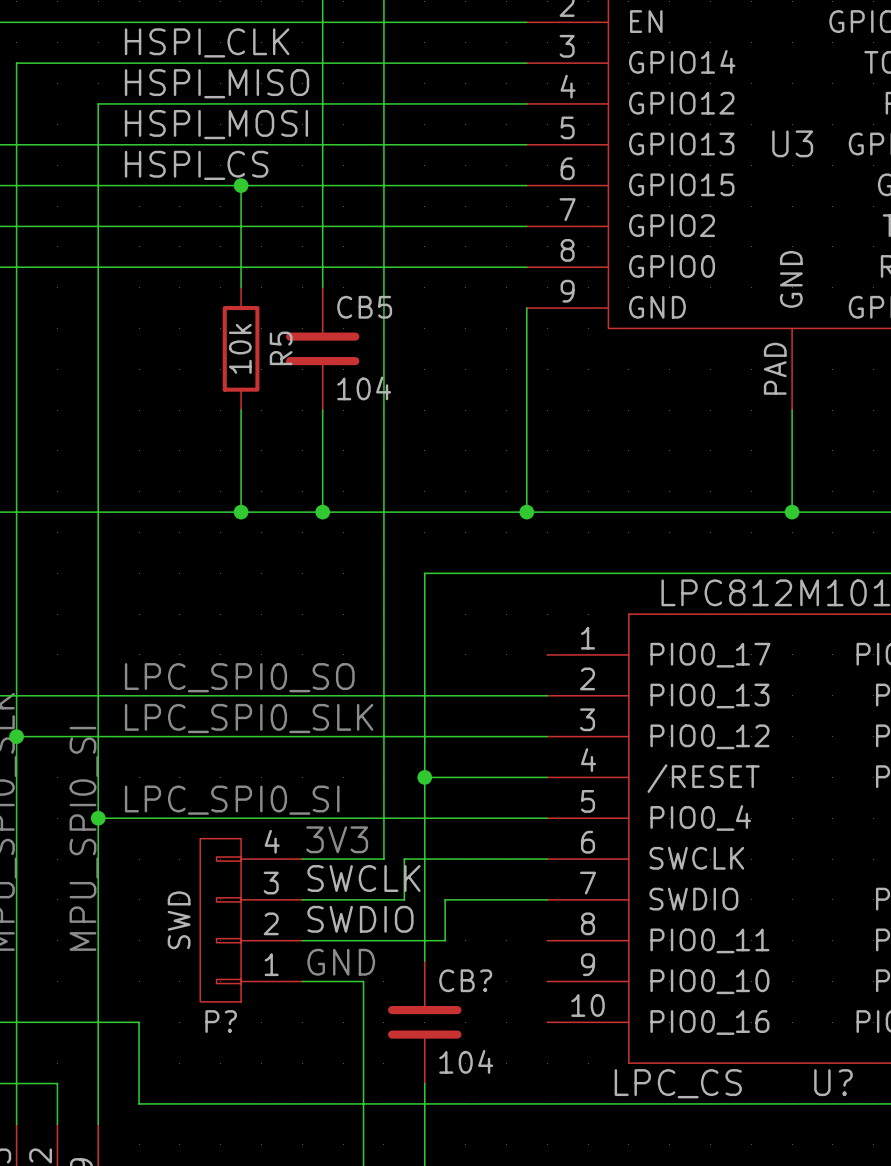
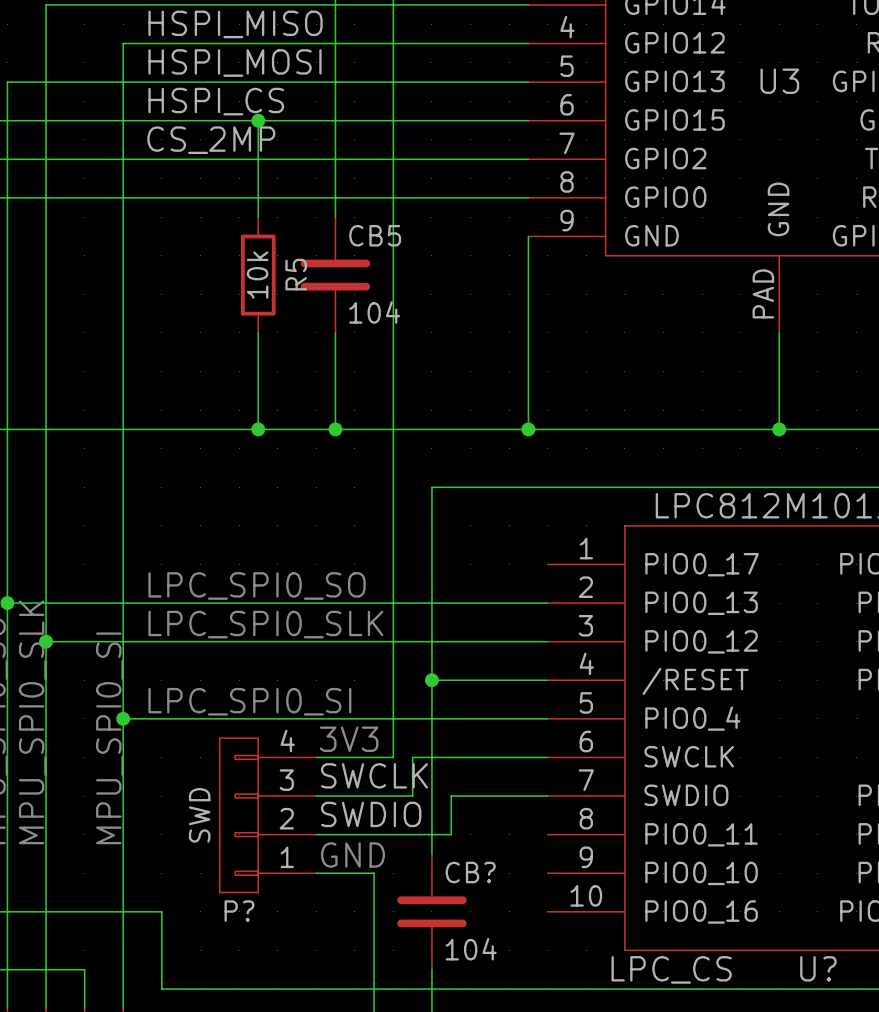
label: none -> CS_2MP (211, 140)

